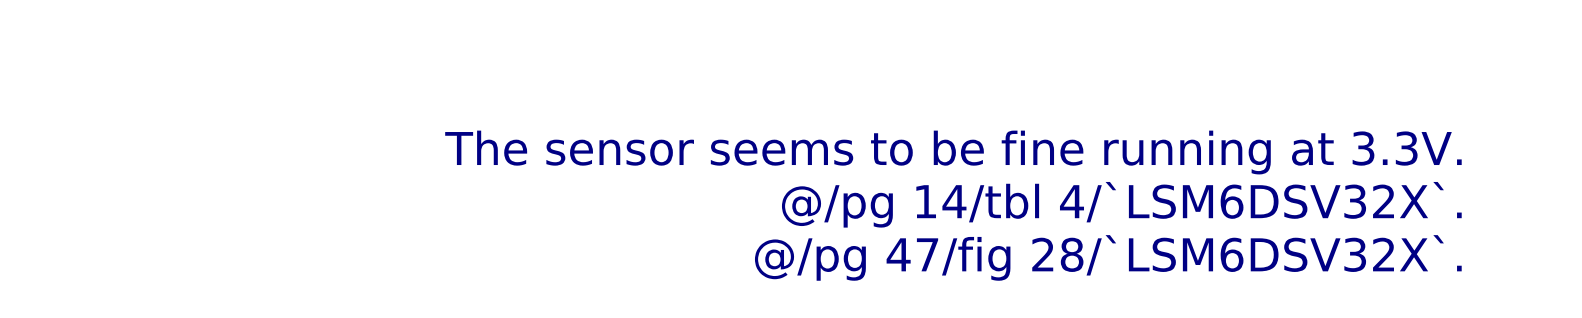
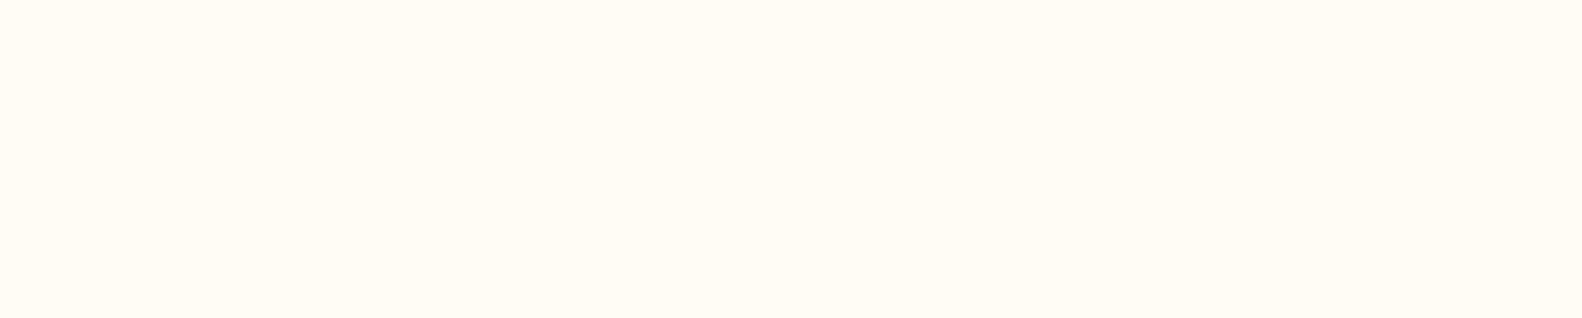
text: The sensor seems to be fine running at 3.3V. (953, 152) -> none
text: @/pg 14/tbl 4/`LSM6DSV32X`. (1121, 204) -> none
text: @/pg 47/fig 28/`LSM6DSV32X`. (1108, 257) -> none

